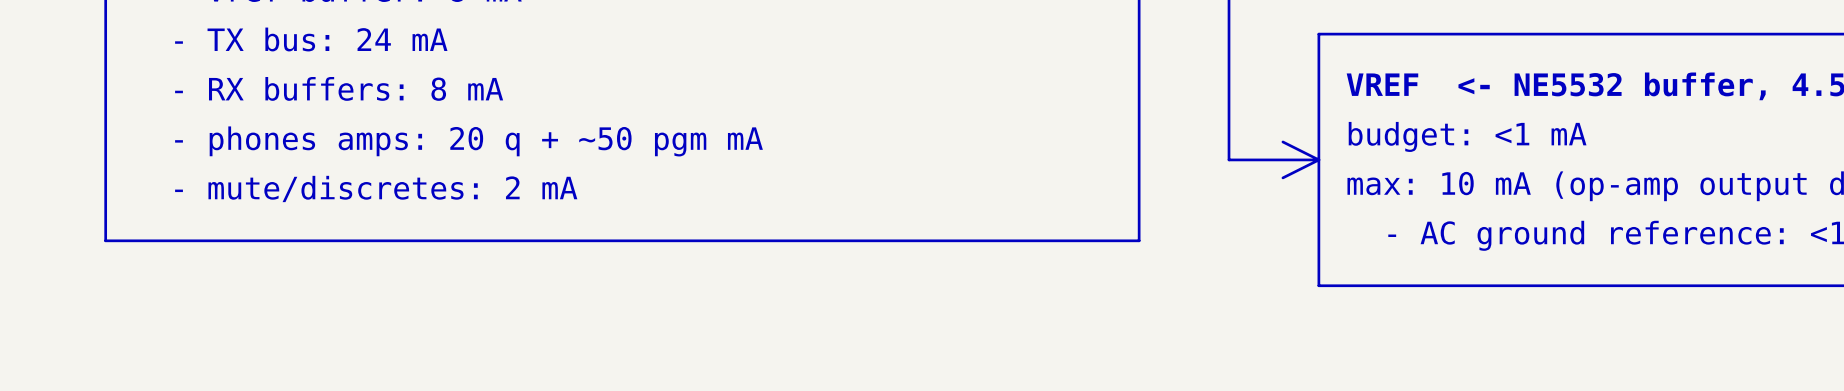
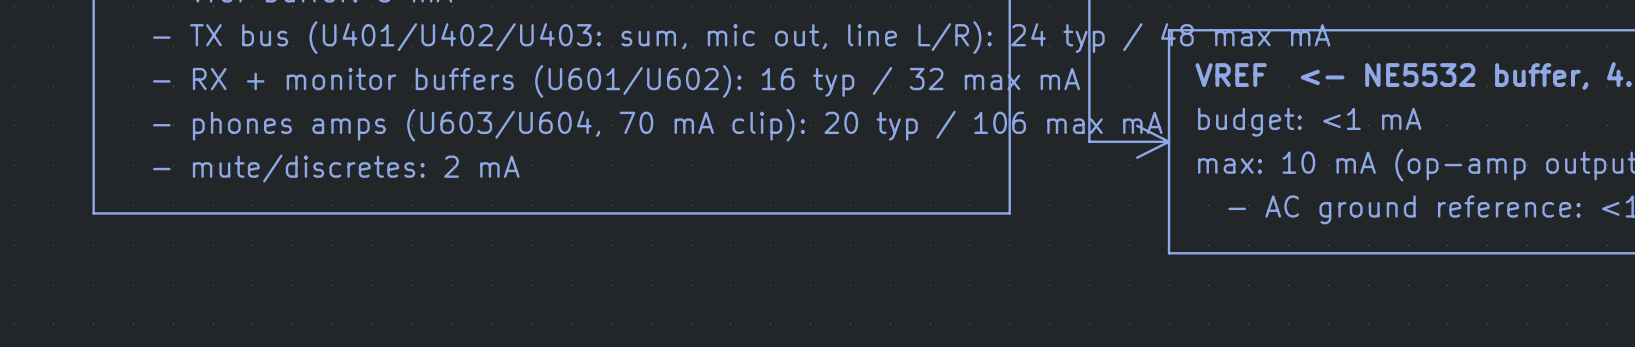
text: - TX bus: 24 mA (311, 39) -> - TX bus (U401/U402/U403: sum, mic out, line L/R): 24 typ / 48 max mA (741, 37)
text: - RX buffers: 8 mA (339, 88) -> - RX + monitor buffers (U601/U602): 16 typ / 32 max mA (616, 81)
text: - phones amps: 20 q + ~50 pgm mA (468, 141) -> - phones amps (U603/U604, 70 mA clip): 20 typ / 106 max mA (657, 125)

